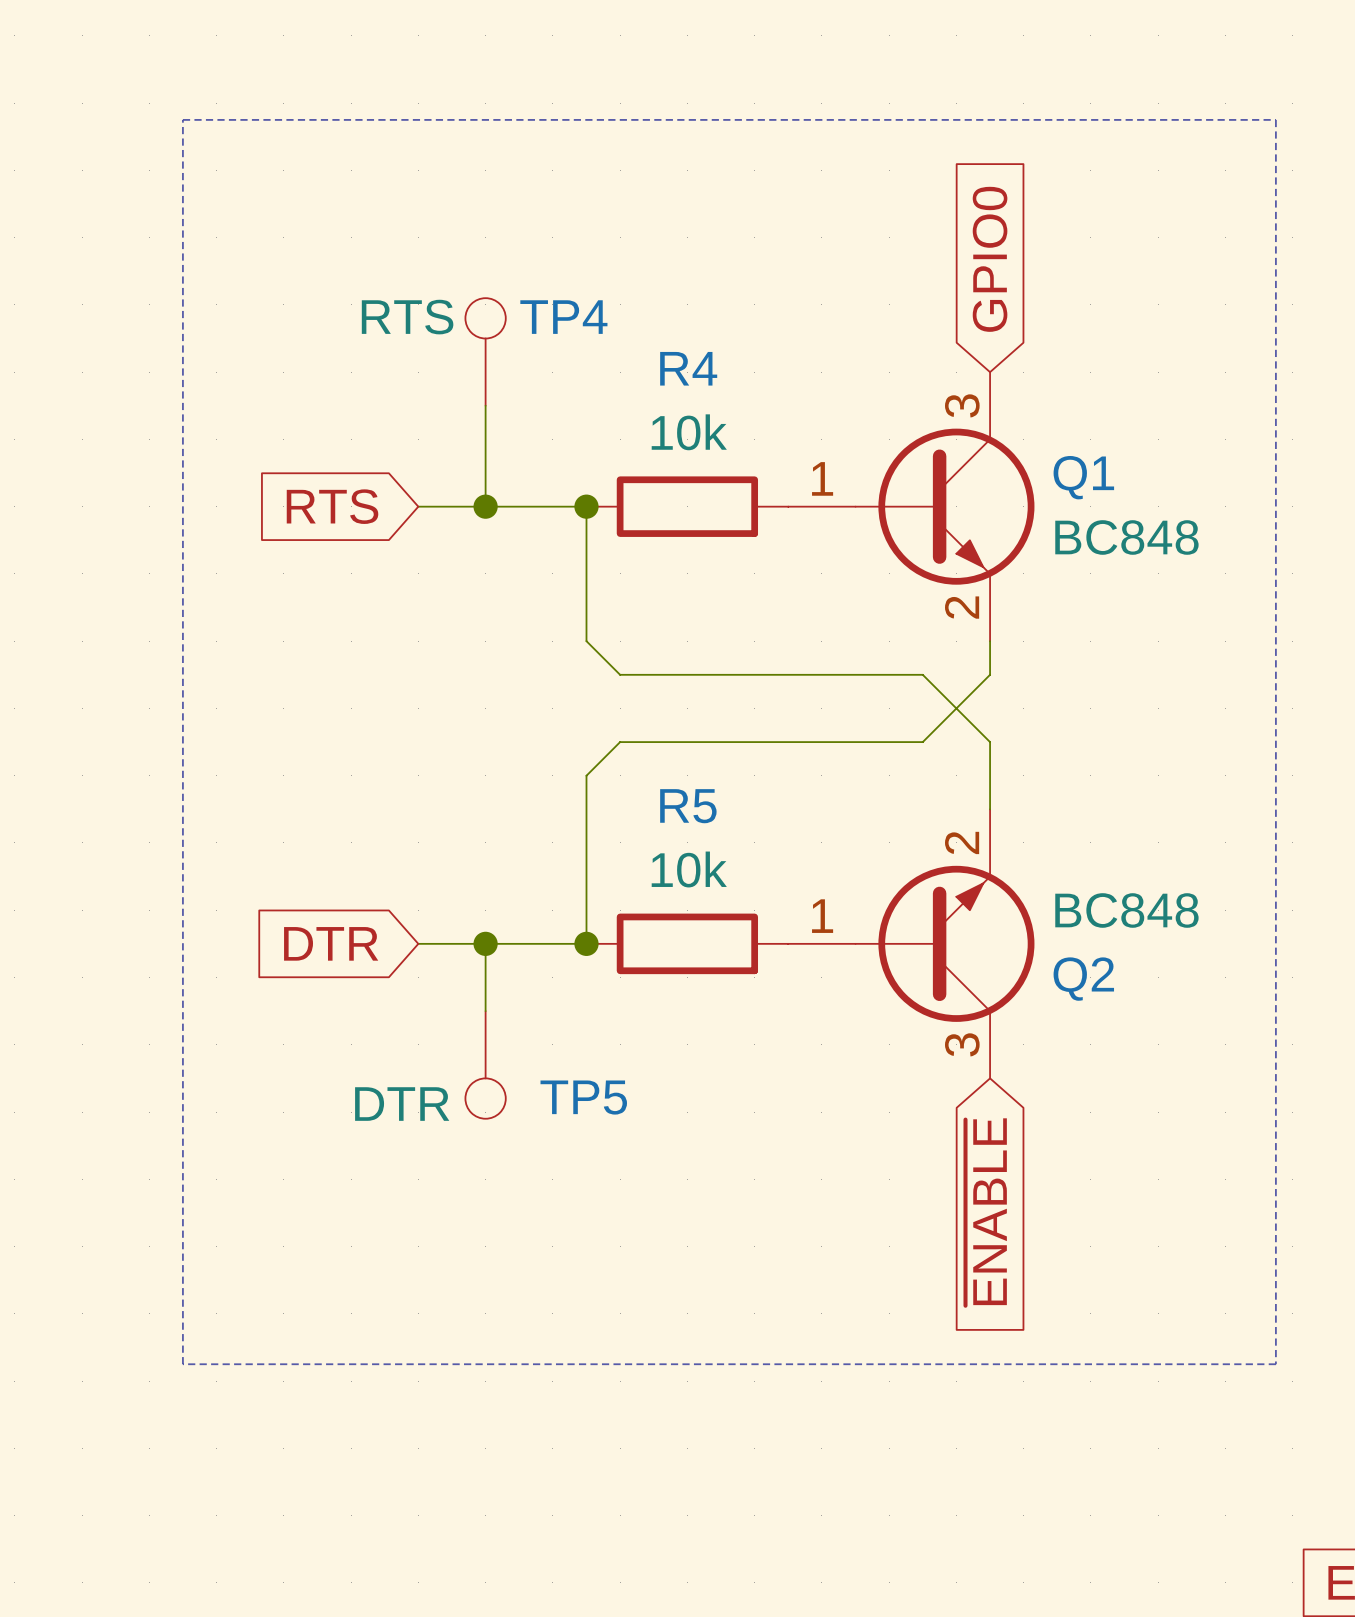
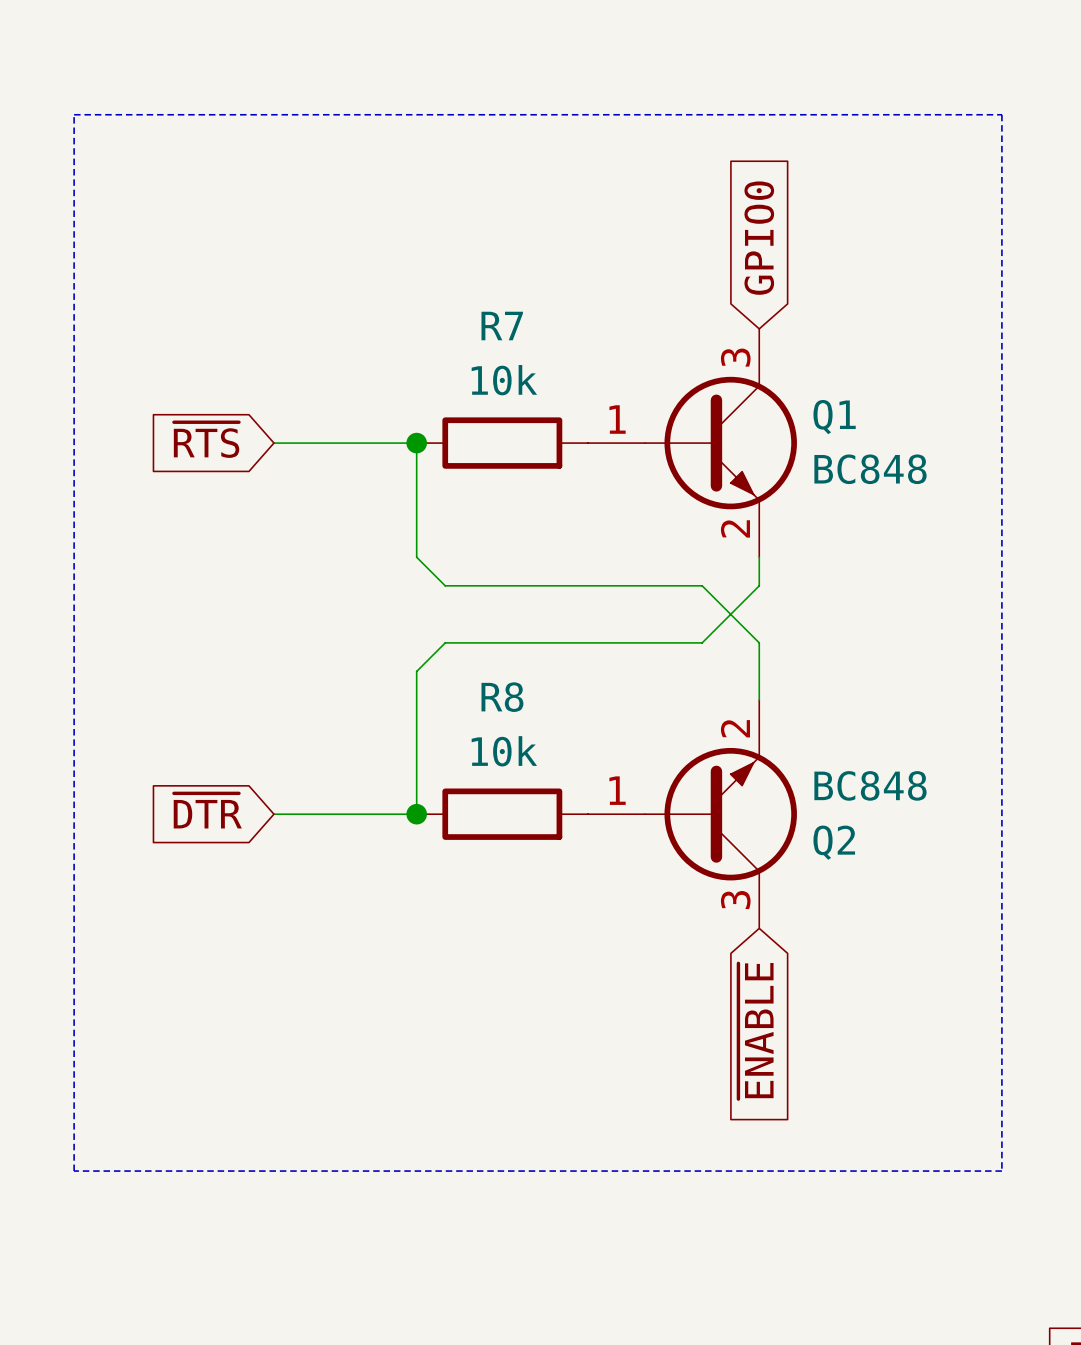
TP4: RTS (485, 351) -> none
R4 name: R4 (688, 368) -> R7 (502, 326)
wire: (485, 405) (485, 506) -> none
global label: RTS (332, 506) -> ~{RTS} (206, 440)
junction: (485, 506) -> none
R5 name: R5 (688, 806) -> R8 (502, 697)
global label: DTR (331, 943) -> ~{DTR} (207, 810)
wire: (485, 943) (485, 1011) -> none
junction: (485, 943) -> none
TP5: DTR (485, 1064) -> none

